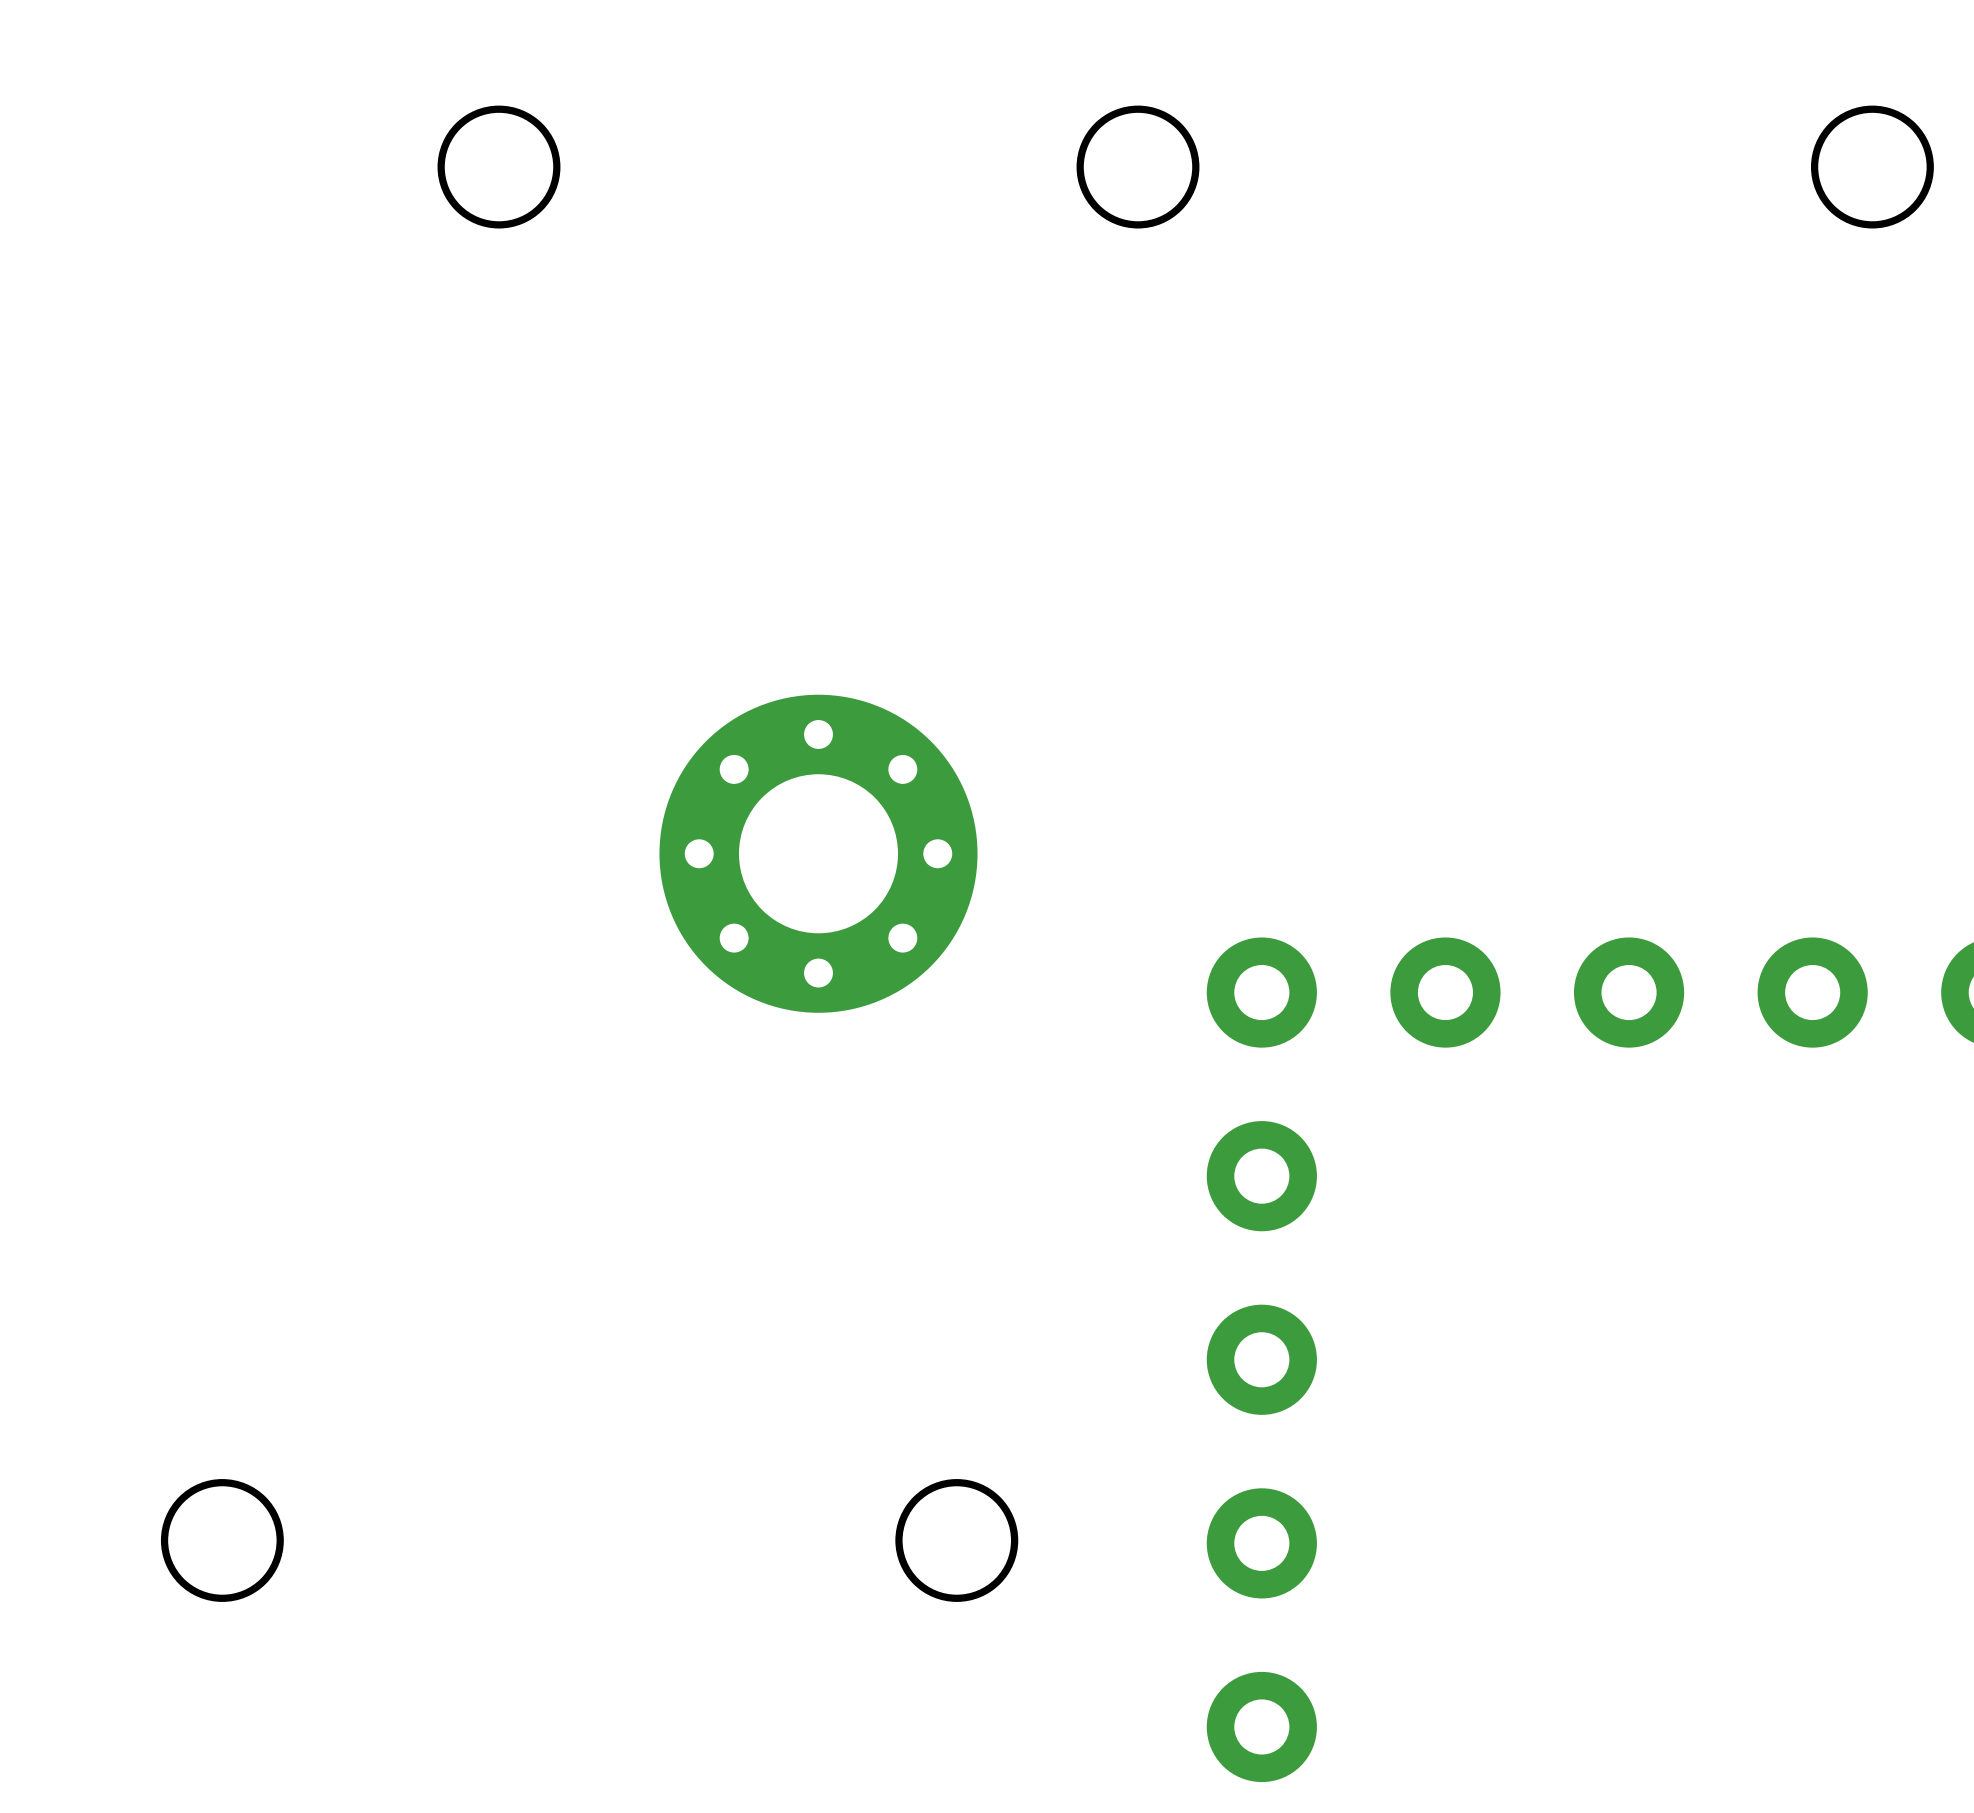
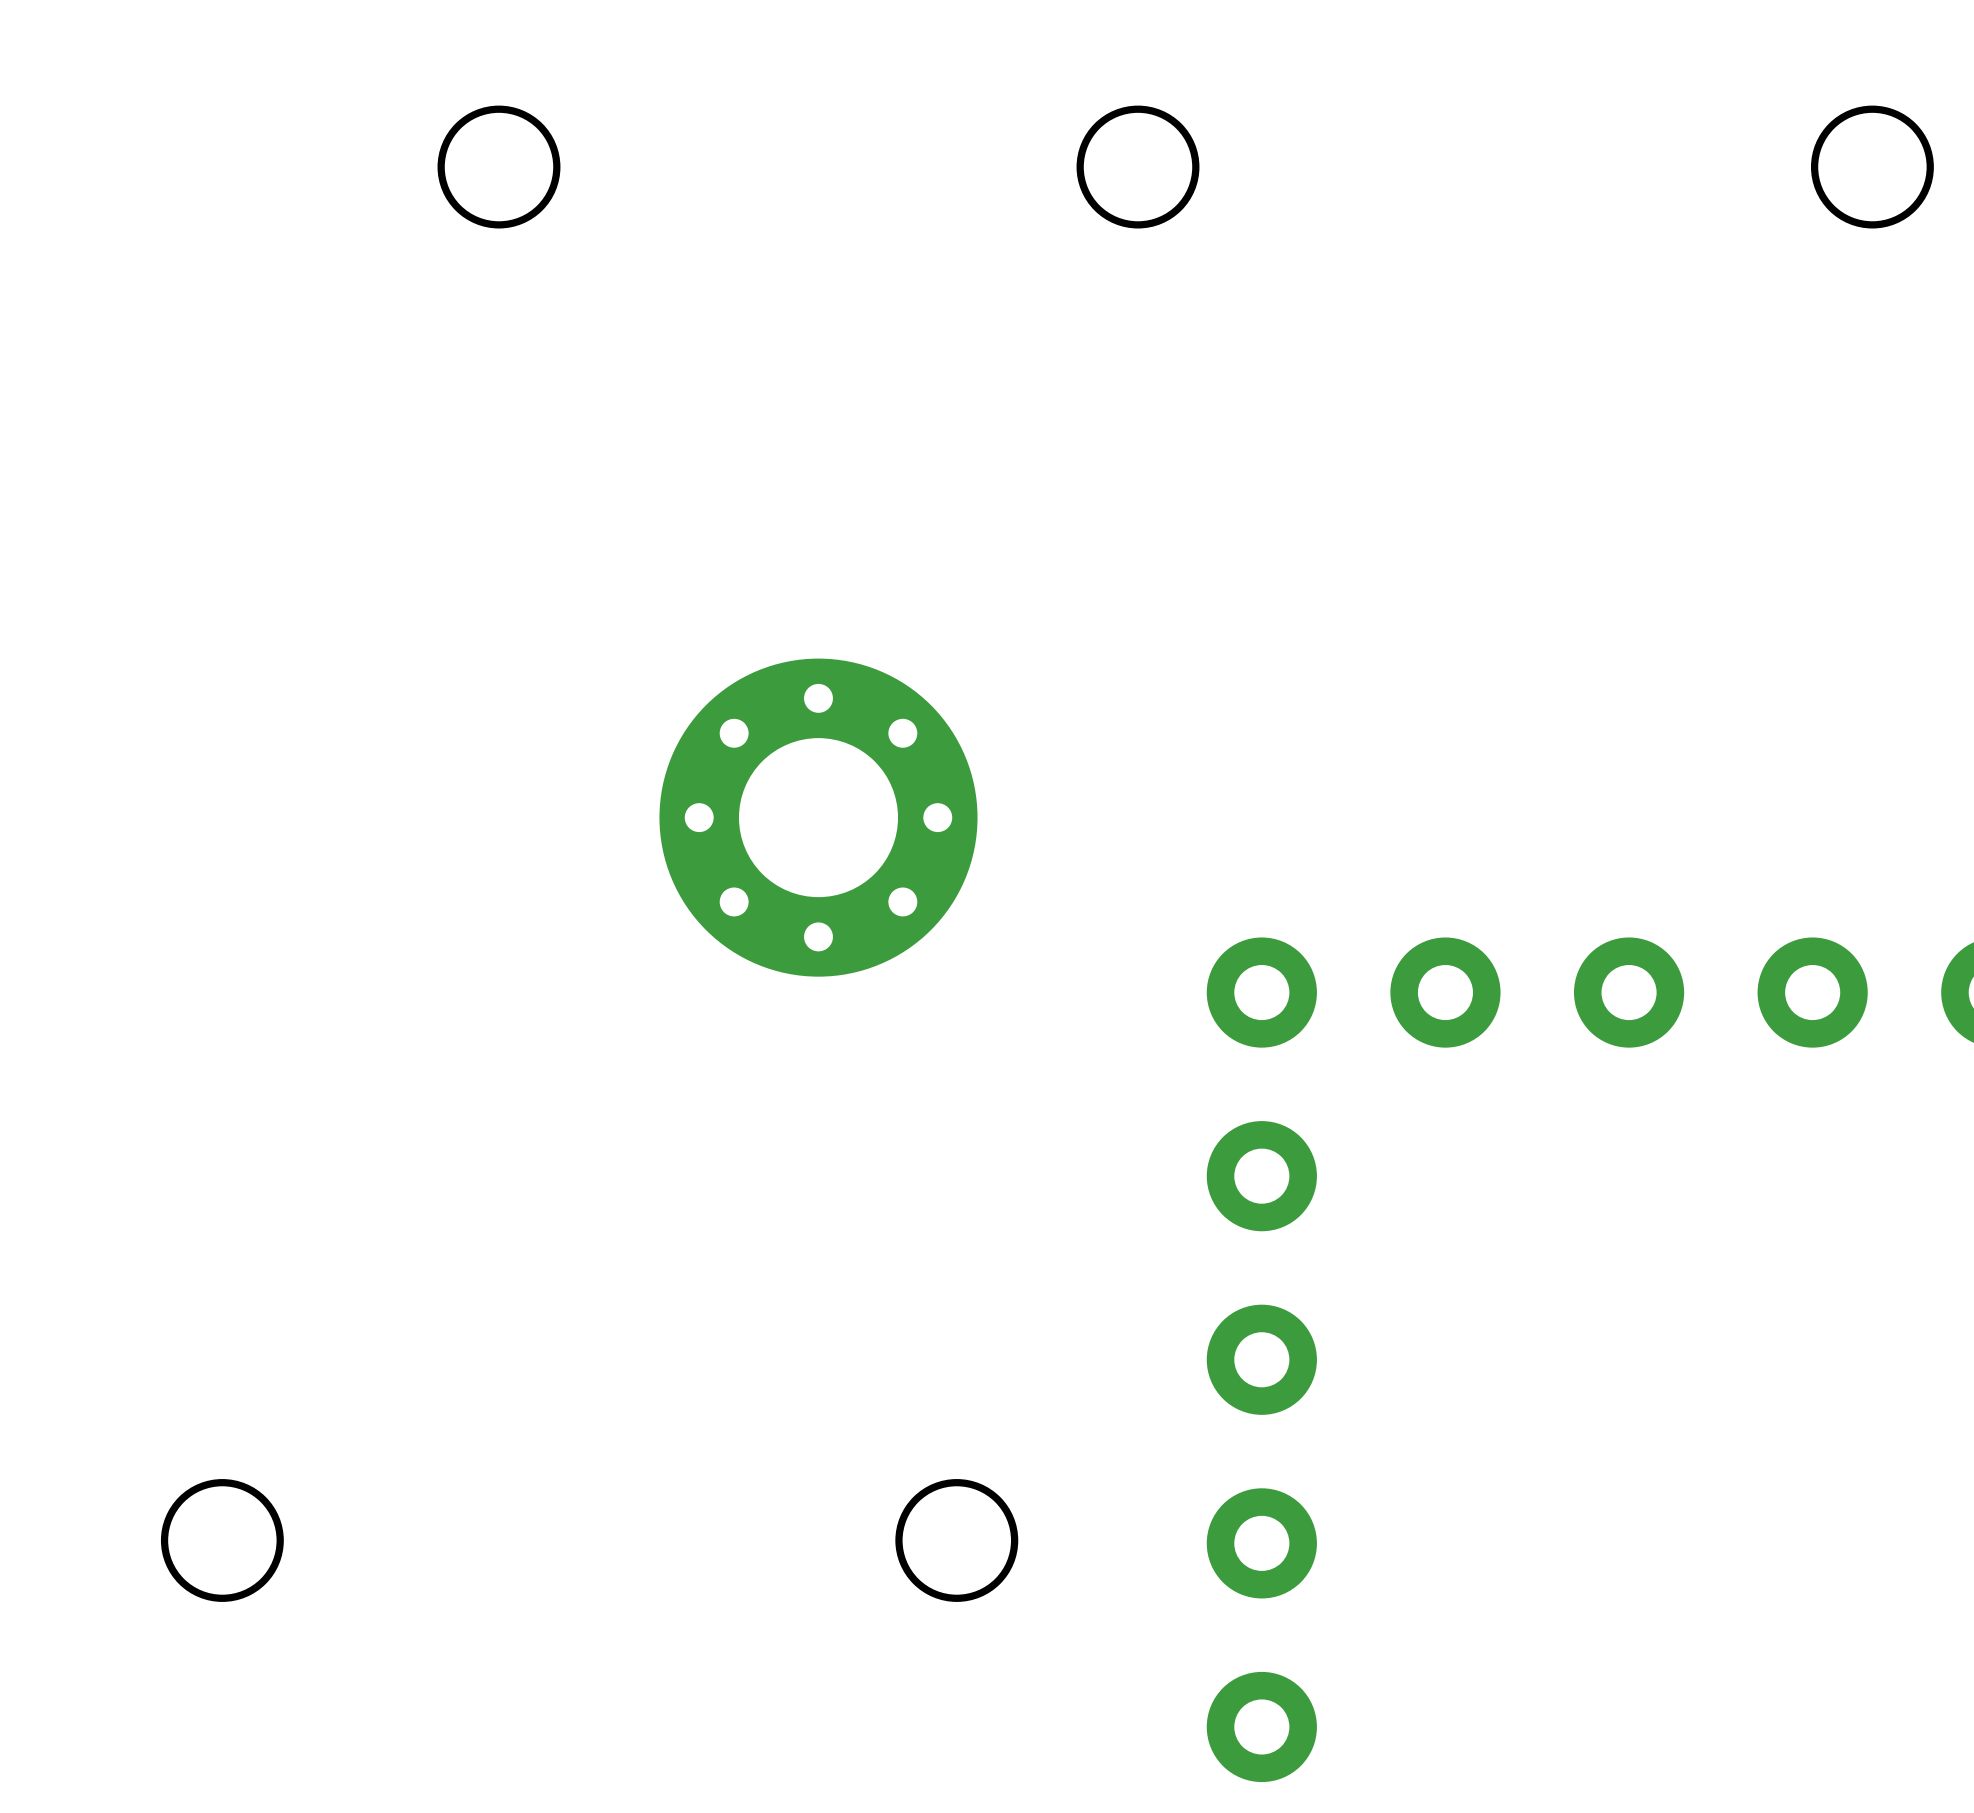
part position: (818, 853) -> (818, 817)

